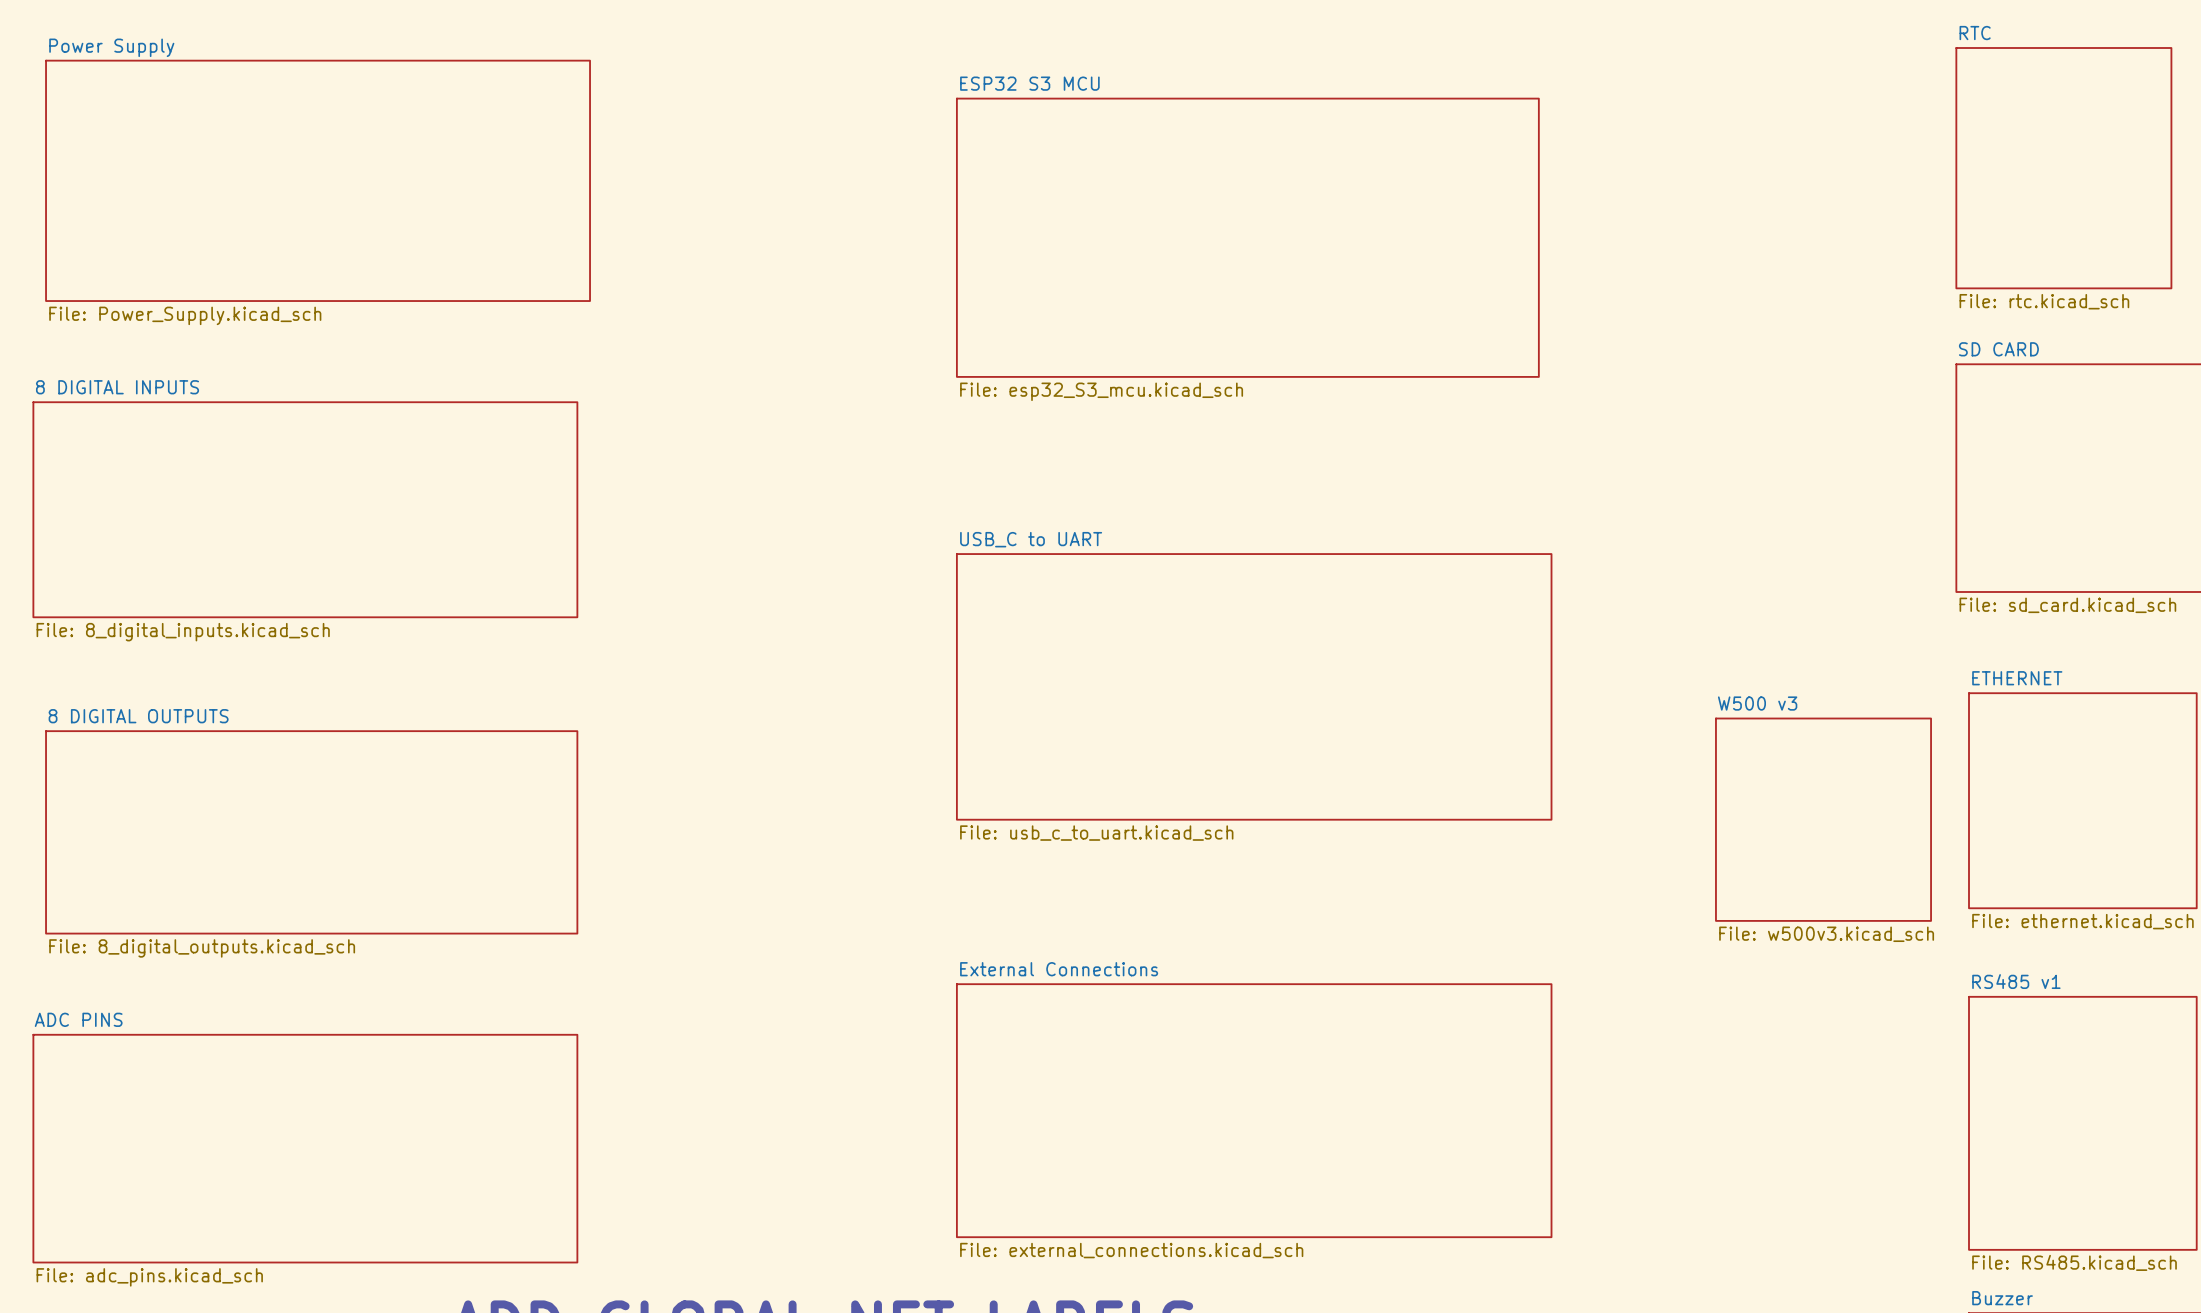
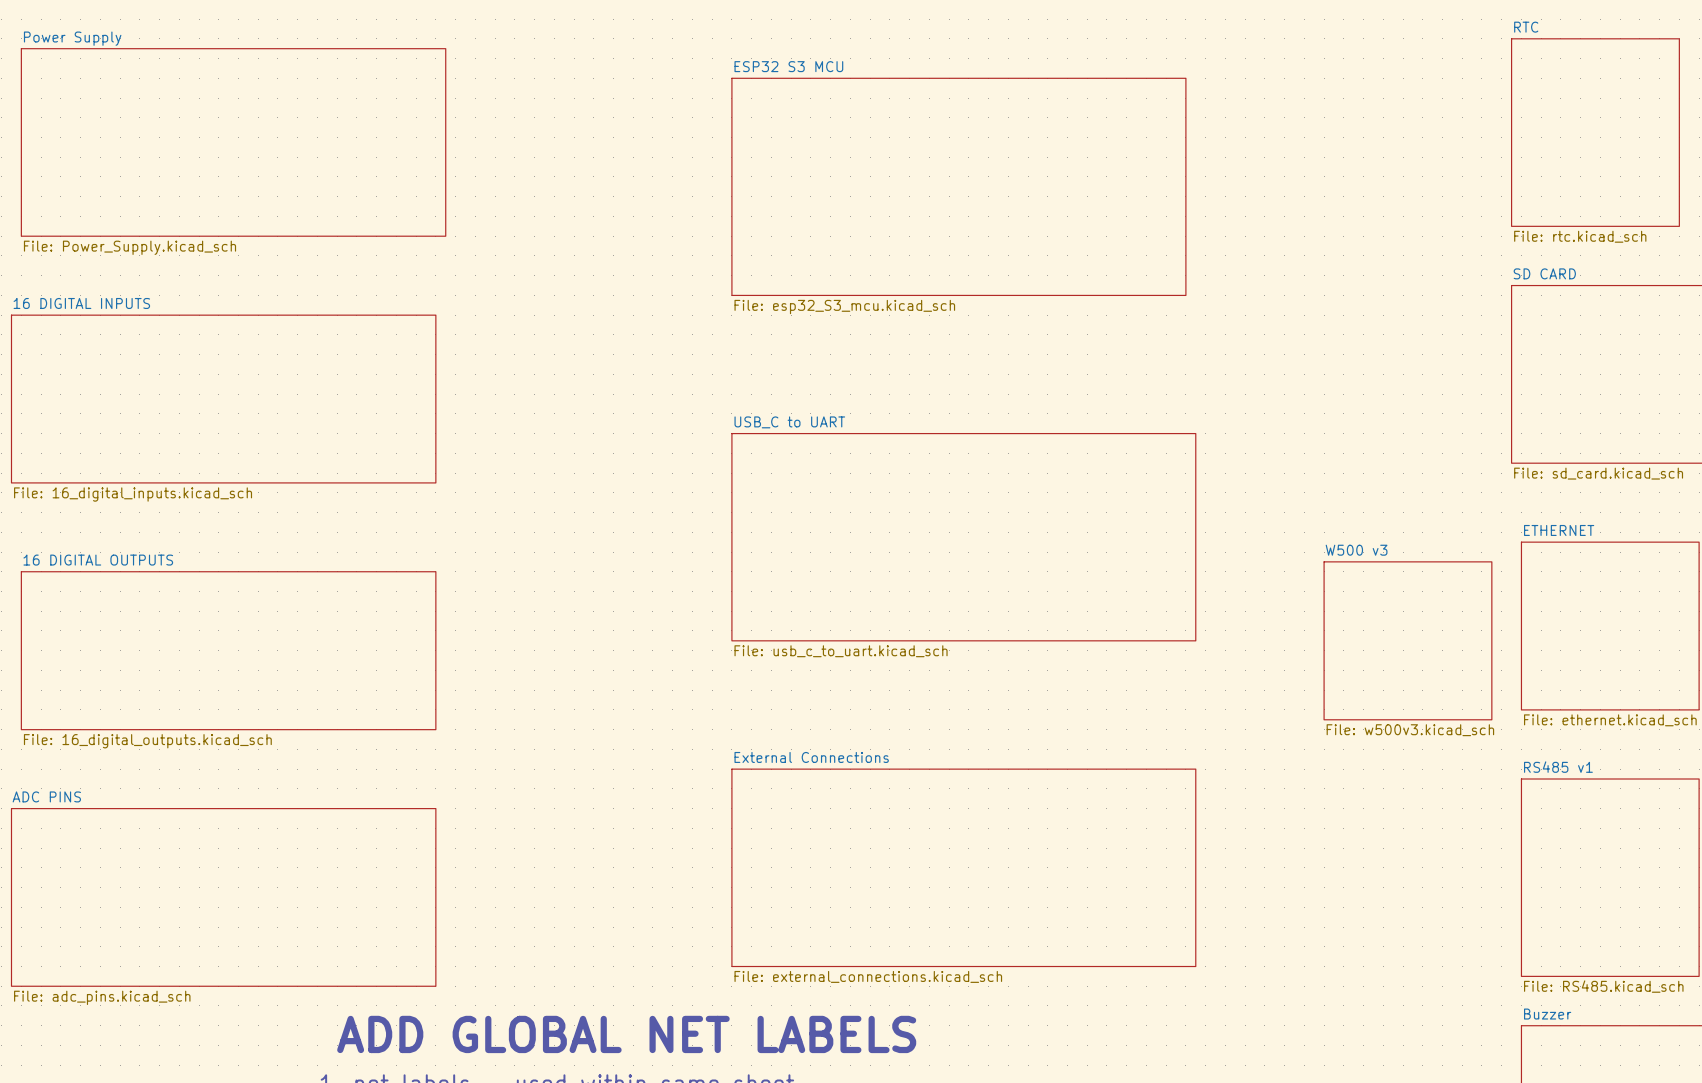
sheet 8 DIGITAL INPUTS name: 8 DIGITAL INPUTS (117, 387) -> 16 DIGITAL INPUTS (81, 303)
sheet 8 DIGITAL INPUTS value: File: 8_digital_inputs.kicad_sch (183, 632) -> File: 16_digital_inputs.kicad_sch (133, 494)
sheet 8 DIGITAL OUTPUTS name: 8 DIGITAL OUTPUTS (138, 716) -> 16 DIGITAL OUTPUTS (98, 560)
sheet 8 DIGITAL OUTPUTS value: File: 8_digital_outputs.kicad_sch (202, 948) -> File: 16_digital_outputs.kicad_sch (147, 741)

